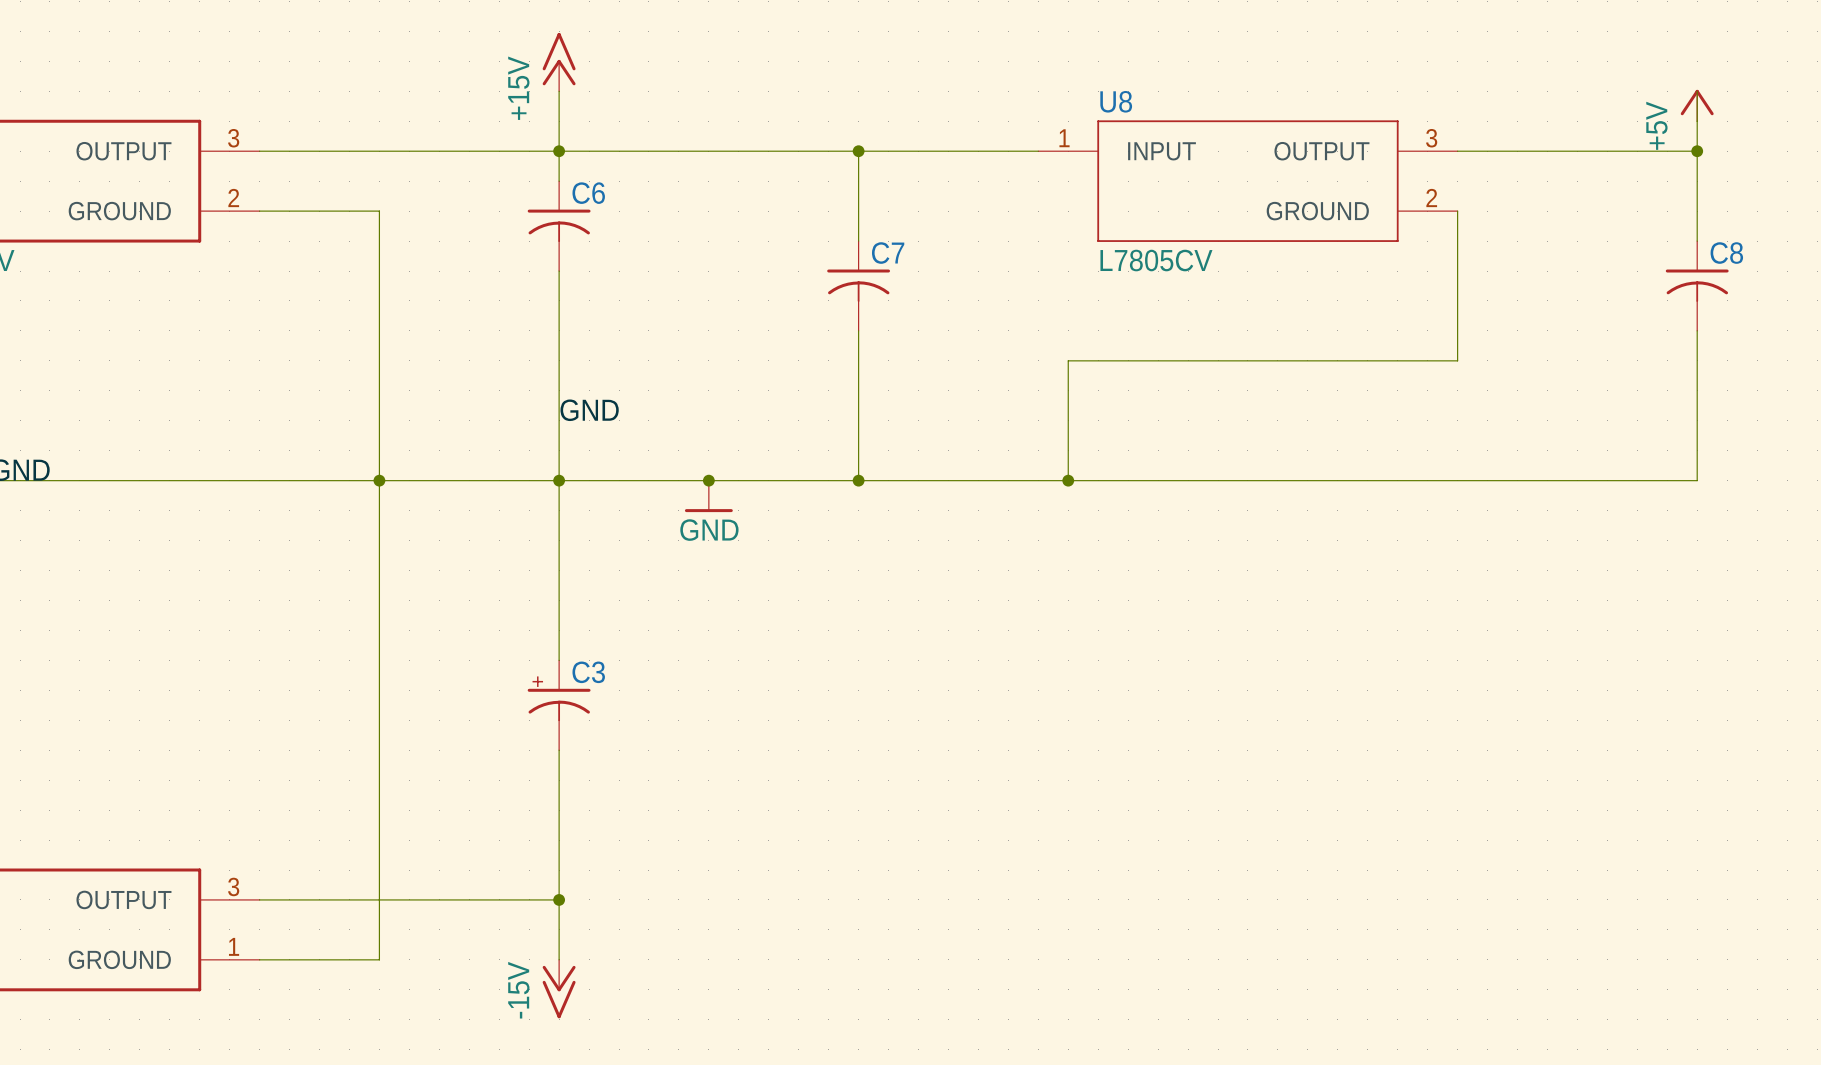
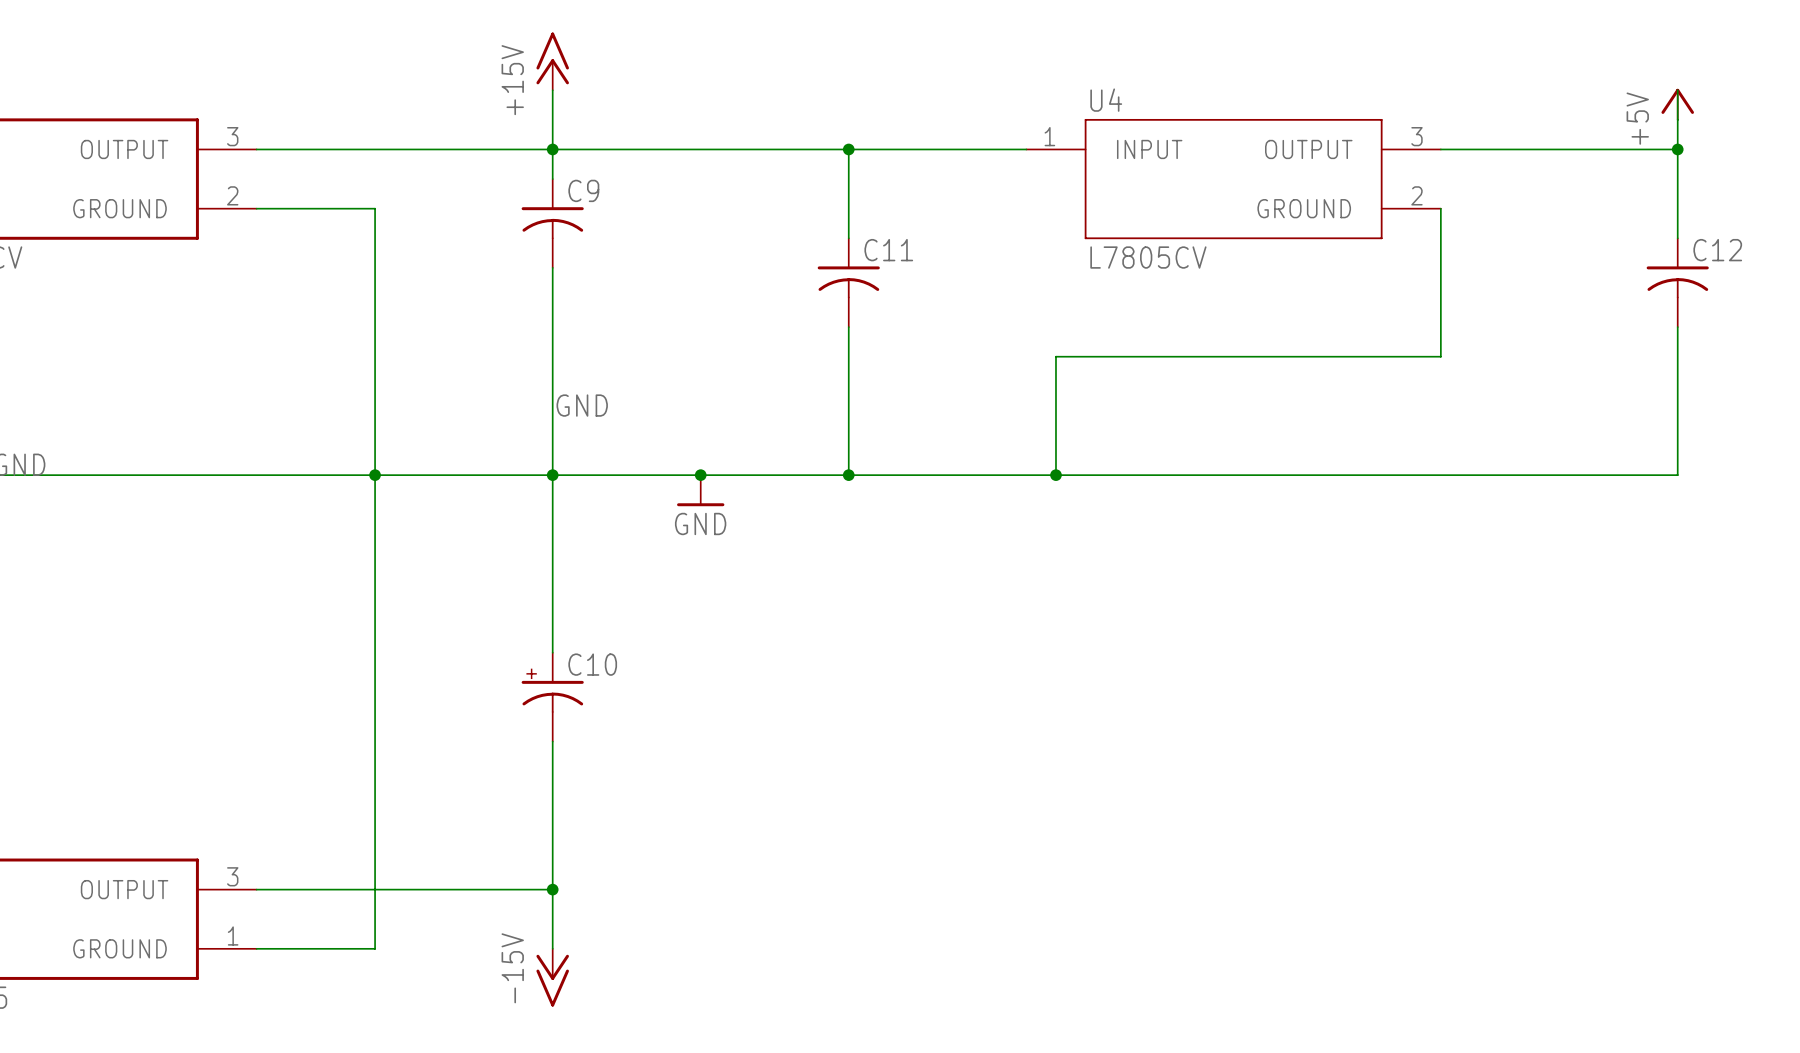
U8 name: U8 (1116, 101) -> U4 (1106, 100)
C6 name: C6 (588, 193) -> C9 (583, 190)
C7 name: C7 (888, 253) -> C11 (888, 250)
C8 name: C8 (1726, 253) -> C12 (1717, 250)
C3 name: C3 (588, 672) -> C10 (592, 664)

